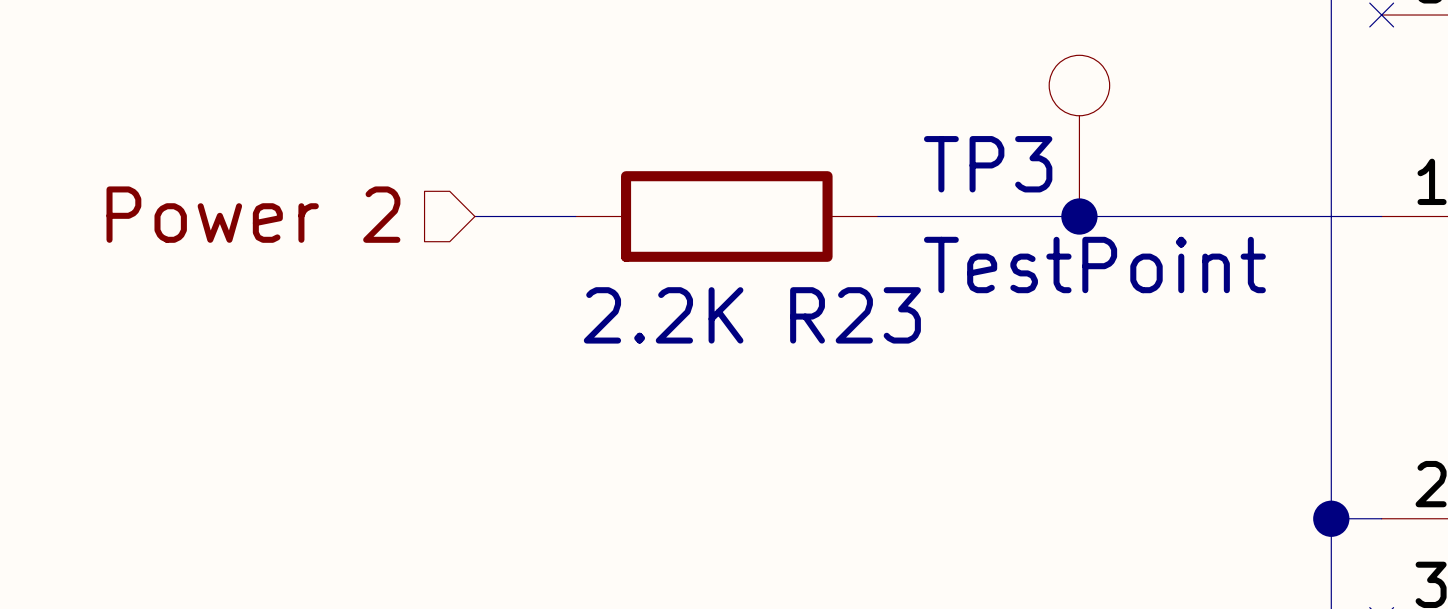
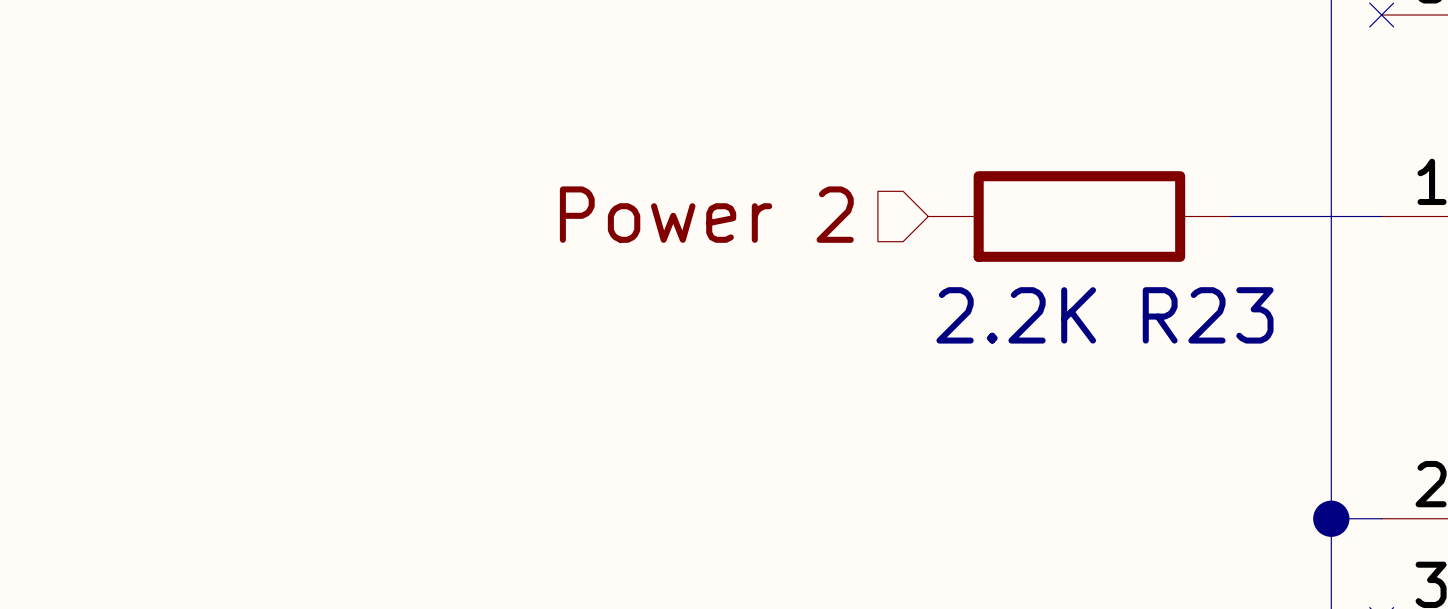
TP3: TestPoint (1079, 135) -> none
hierarchical label position: Power 2 (253, 214) -> Power 2 (706, 214)
wire: (474, 216) (575, 216) -> none
R23 position: (726, 216) -> (1079, 216)
wire: (877, 216) (1230, 216) -> none
junction: (1079, 216) -> none

